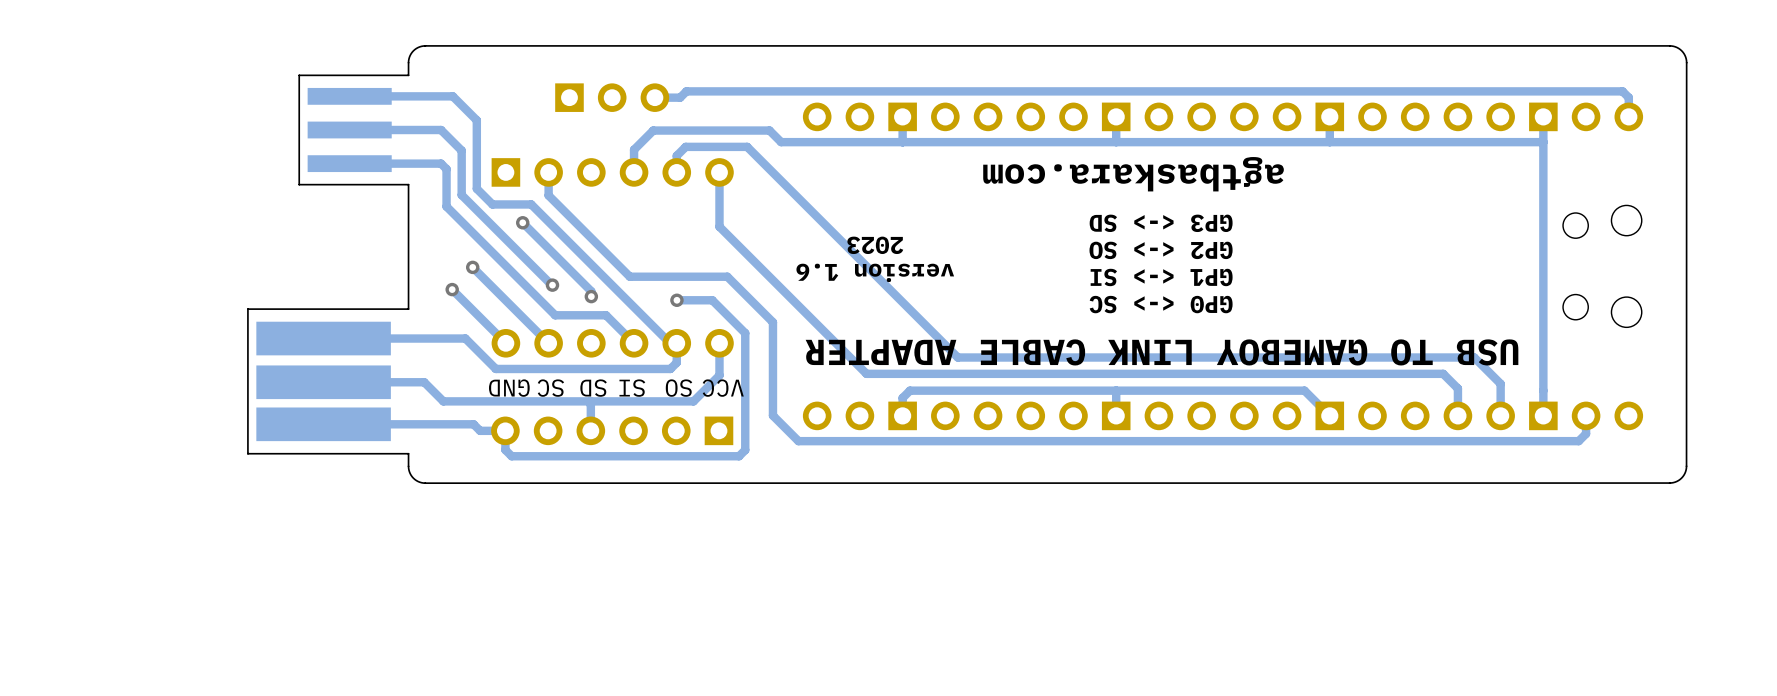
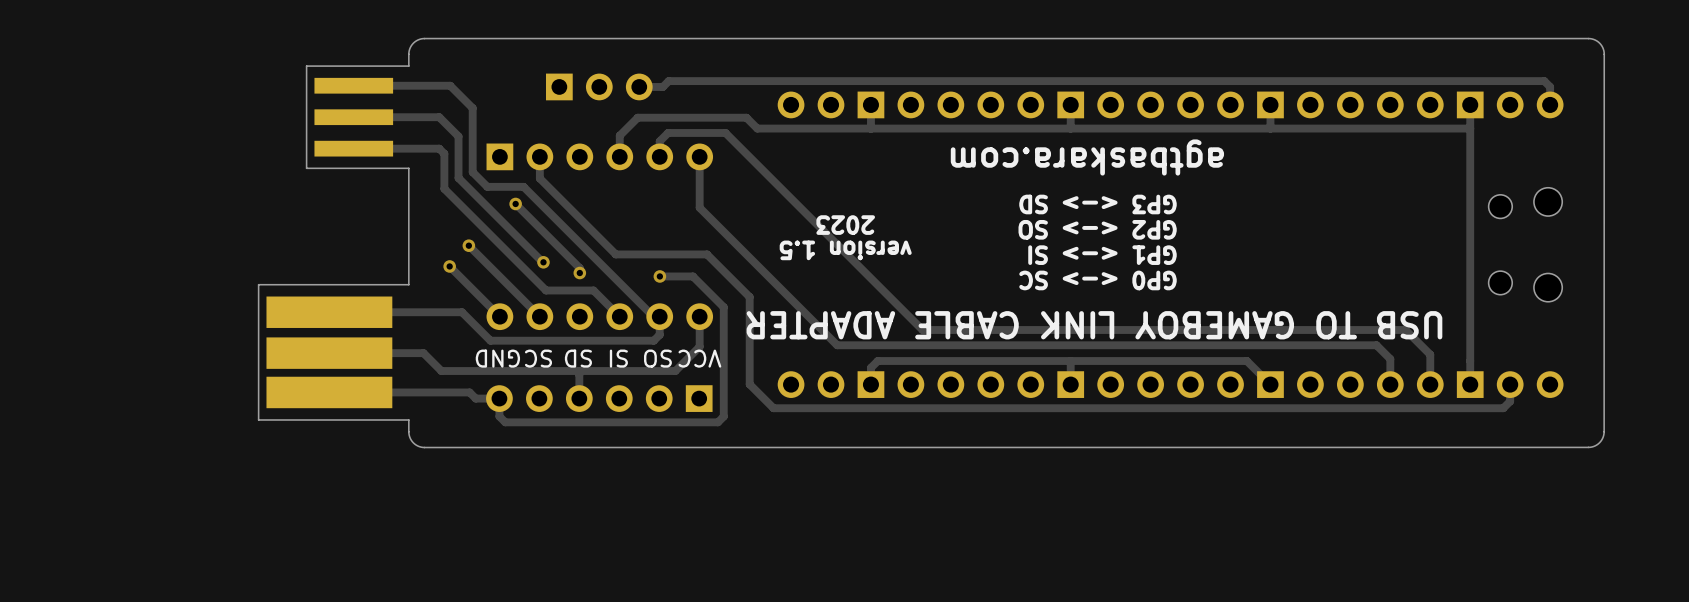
text: version 1.6 (875, 272) -> version 1.5 (845, 250)

